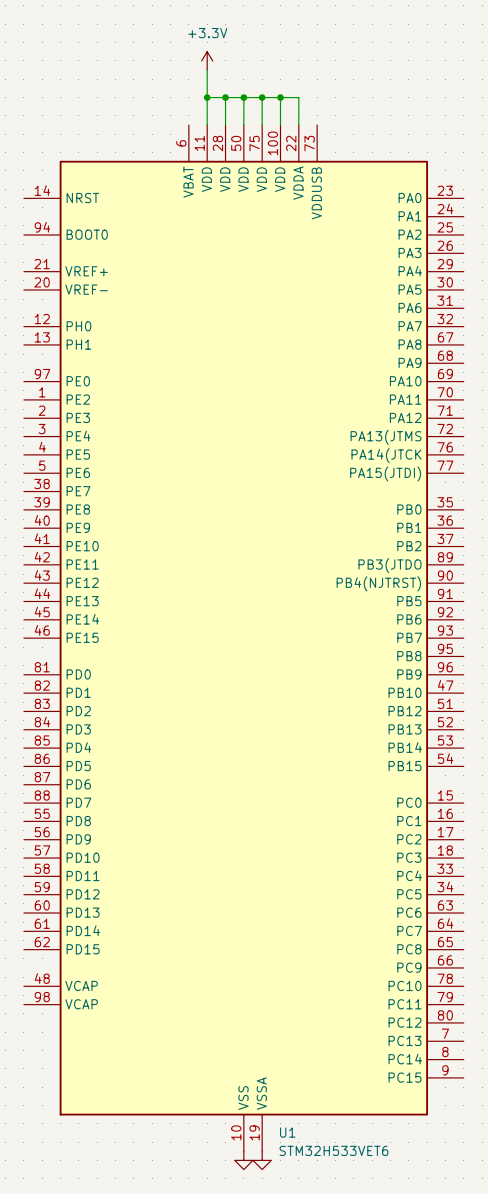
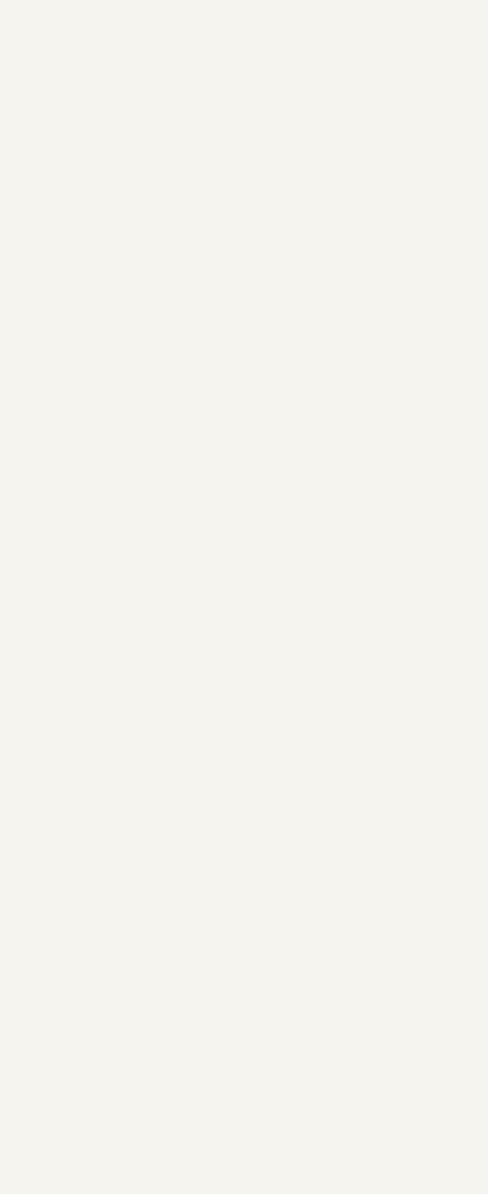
power symbol: +3.3V (207, 60) -> none
wire: (207, 70) (207, 125) -> none
wire: (207, 97) (298, 97) (298, 125) -> none
junction: (207, 97) -> none
wire: (225, 97) (225, 125) -> none
junction: (225, 97) -> none
wire: (243, 97) (243, 125) -> none
junction: (243, 97) -> none
wire: (262, 97) (262, 125) -> none
junction: (262, 97) -> none
wire: (280, 97) (280, 125) -> none
junction: (280, 97) -> none
U1: STM32H533VET6 (243, 638) -> none
power symbol: (243, 1160) -> none
power symbol: (262, 1160) -> none

